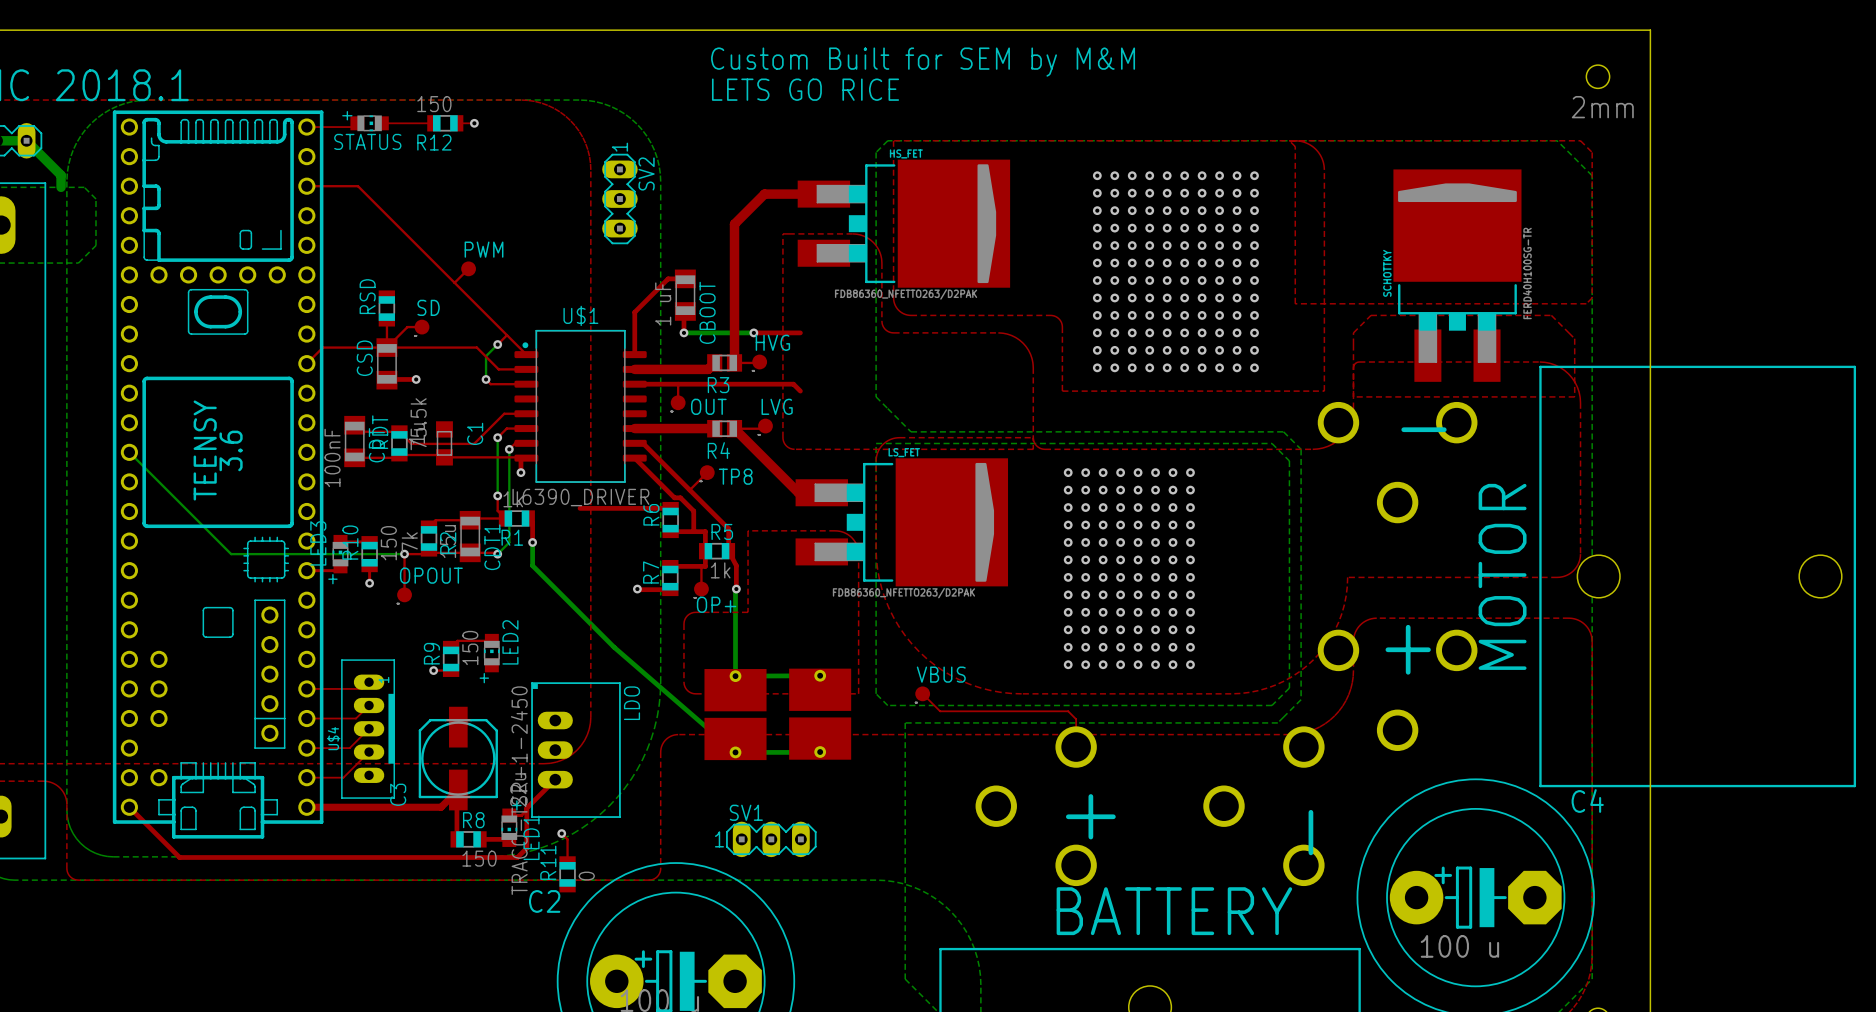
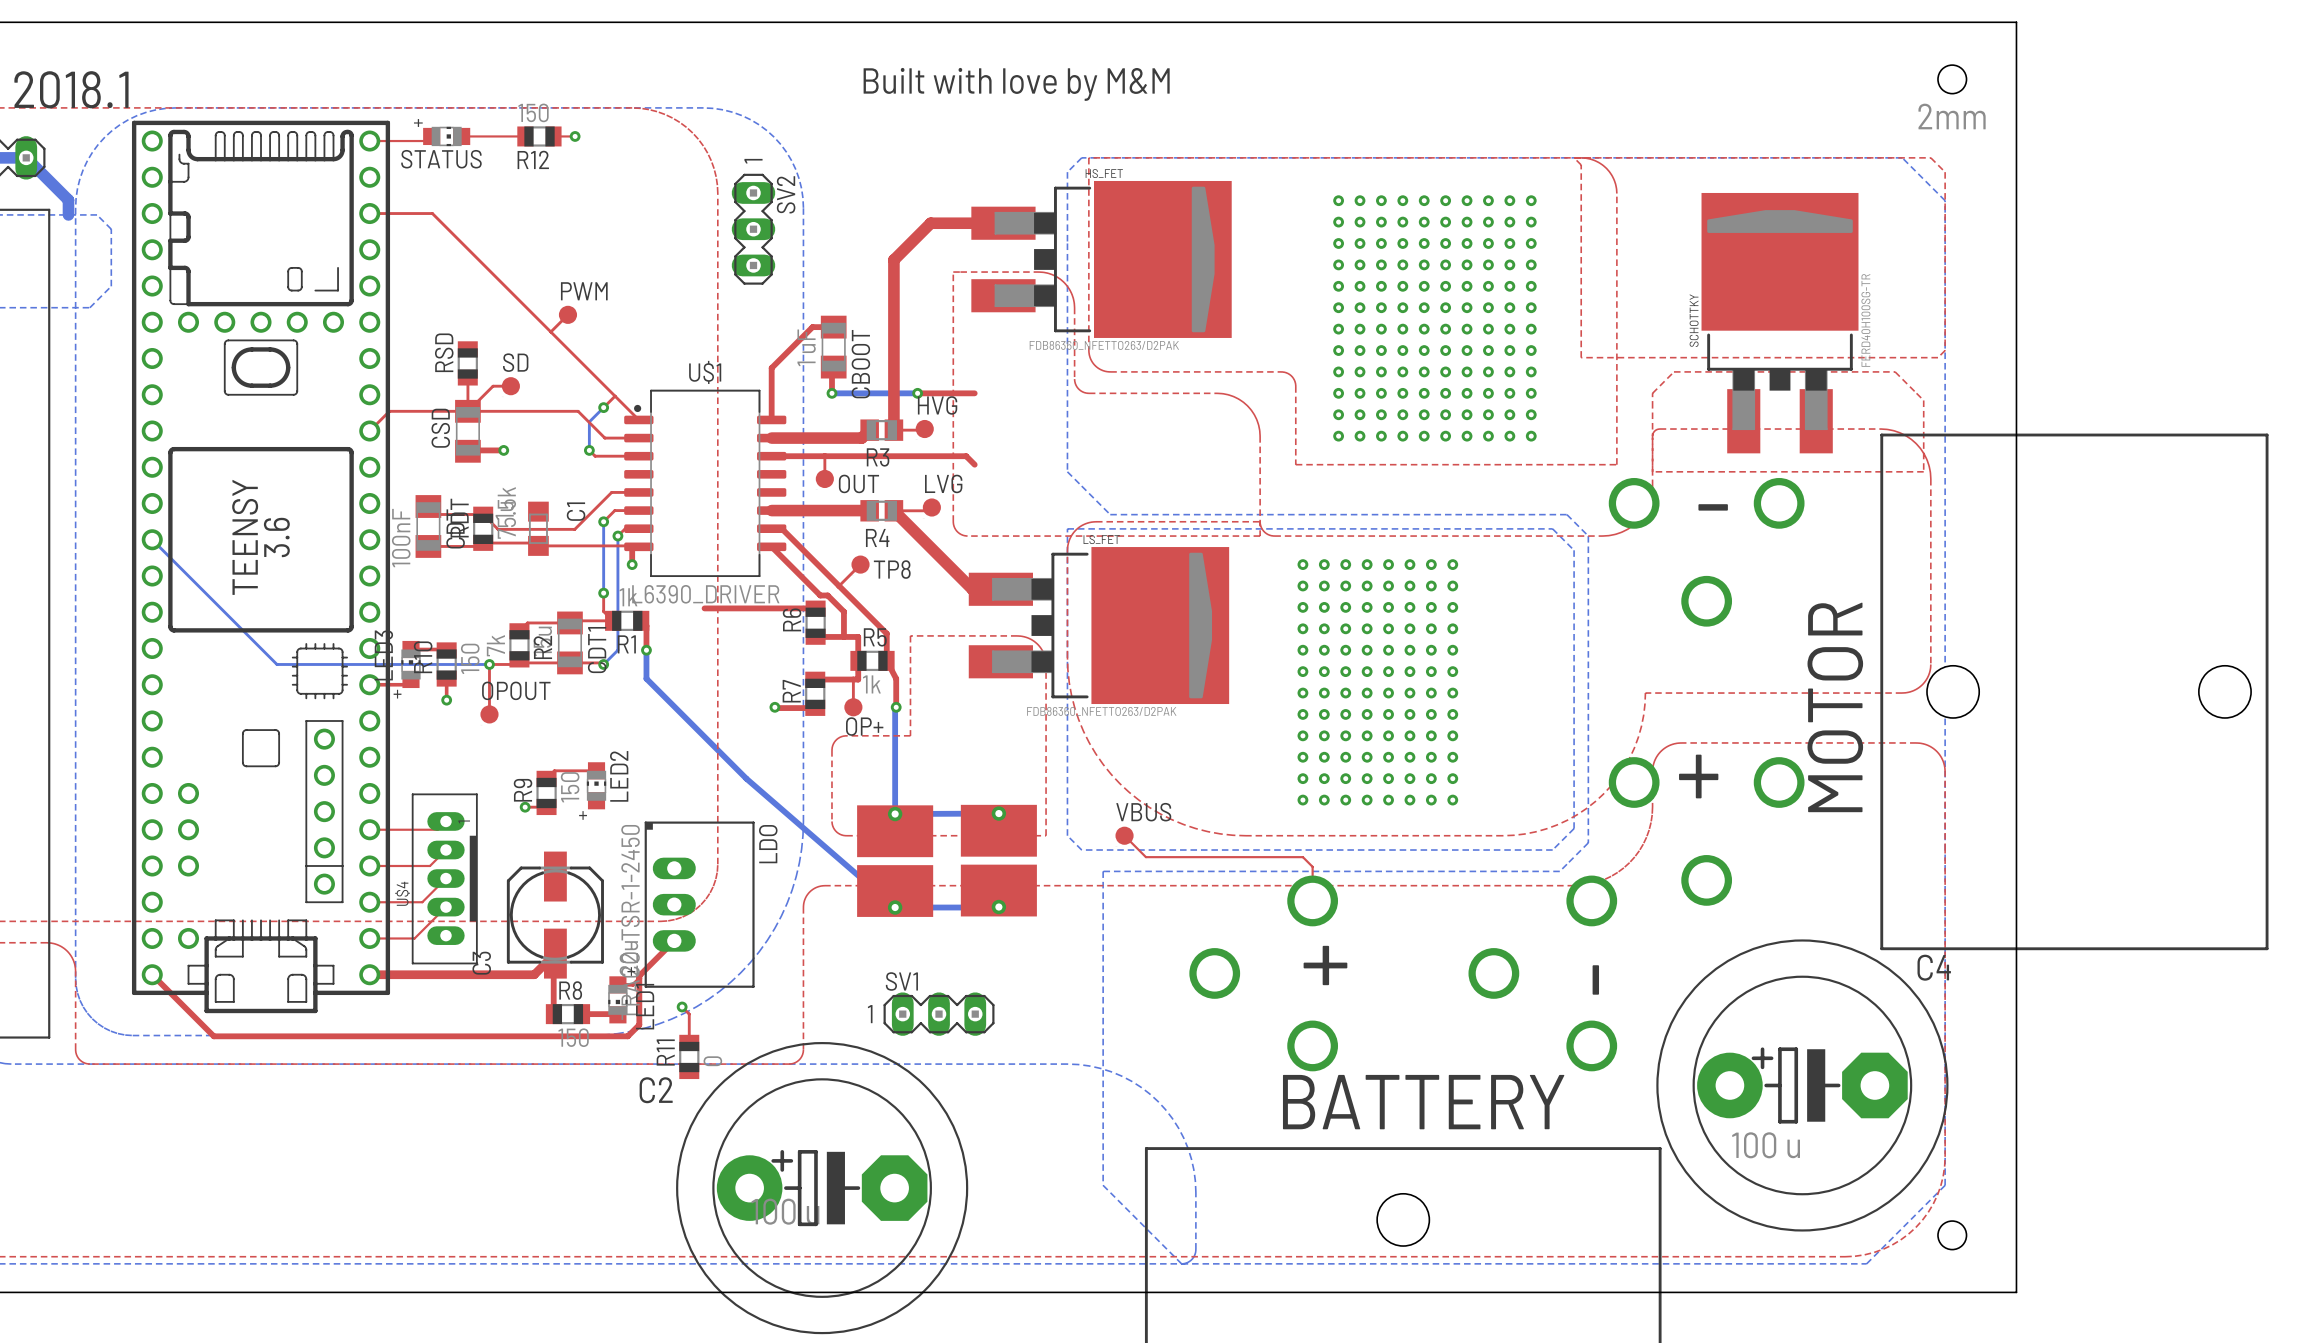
text: Custom Built for SEM by M&M (923, 62) -> none
text: none -> Built with love by M&M (1016, 84)
text: LETS GO RICE (805, 89) -> none

